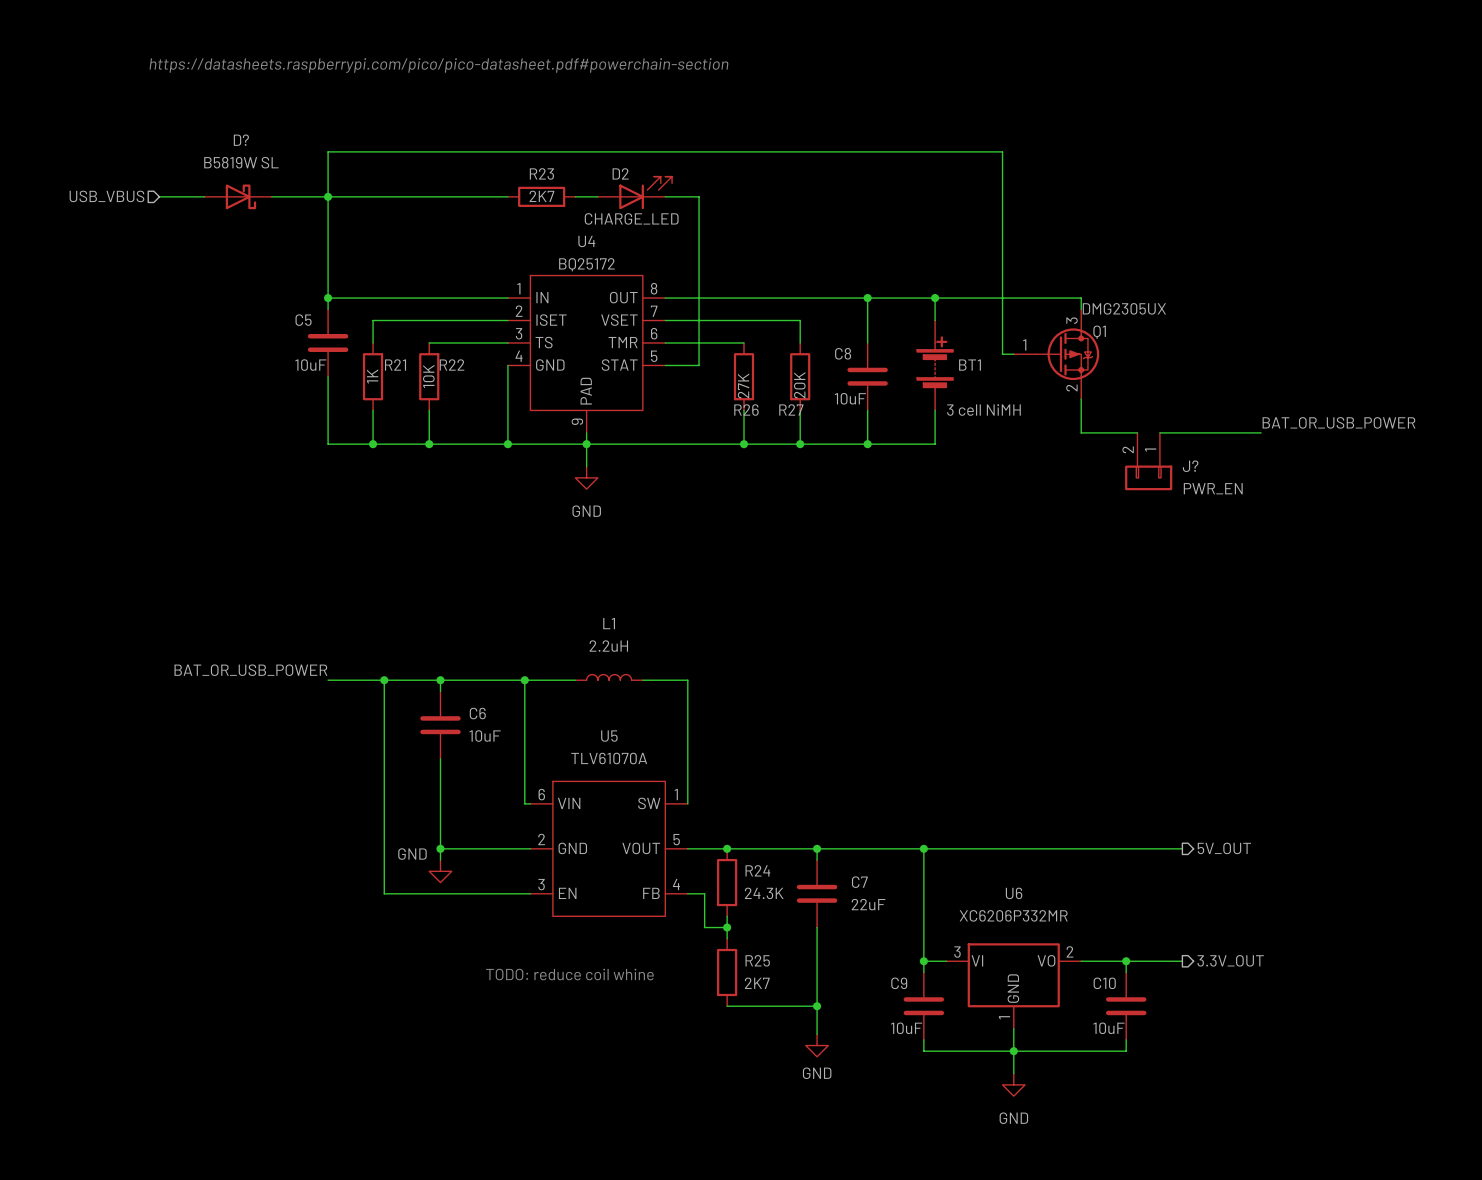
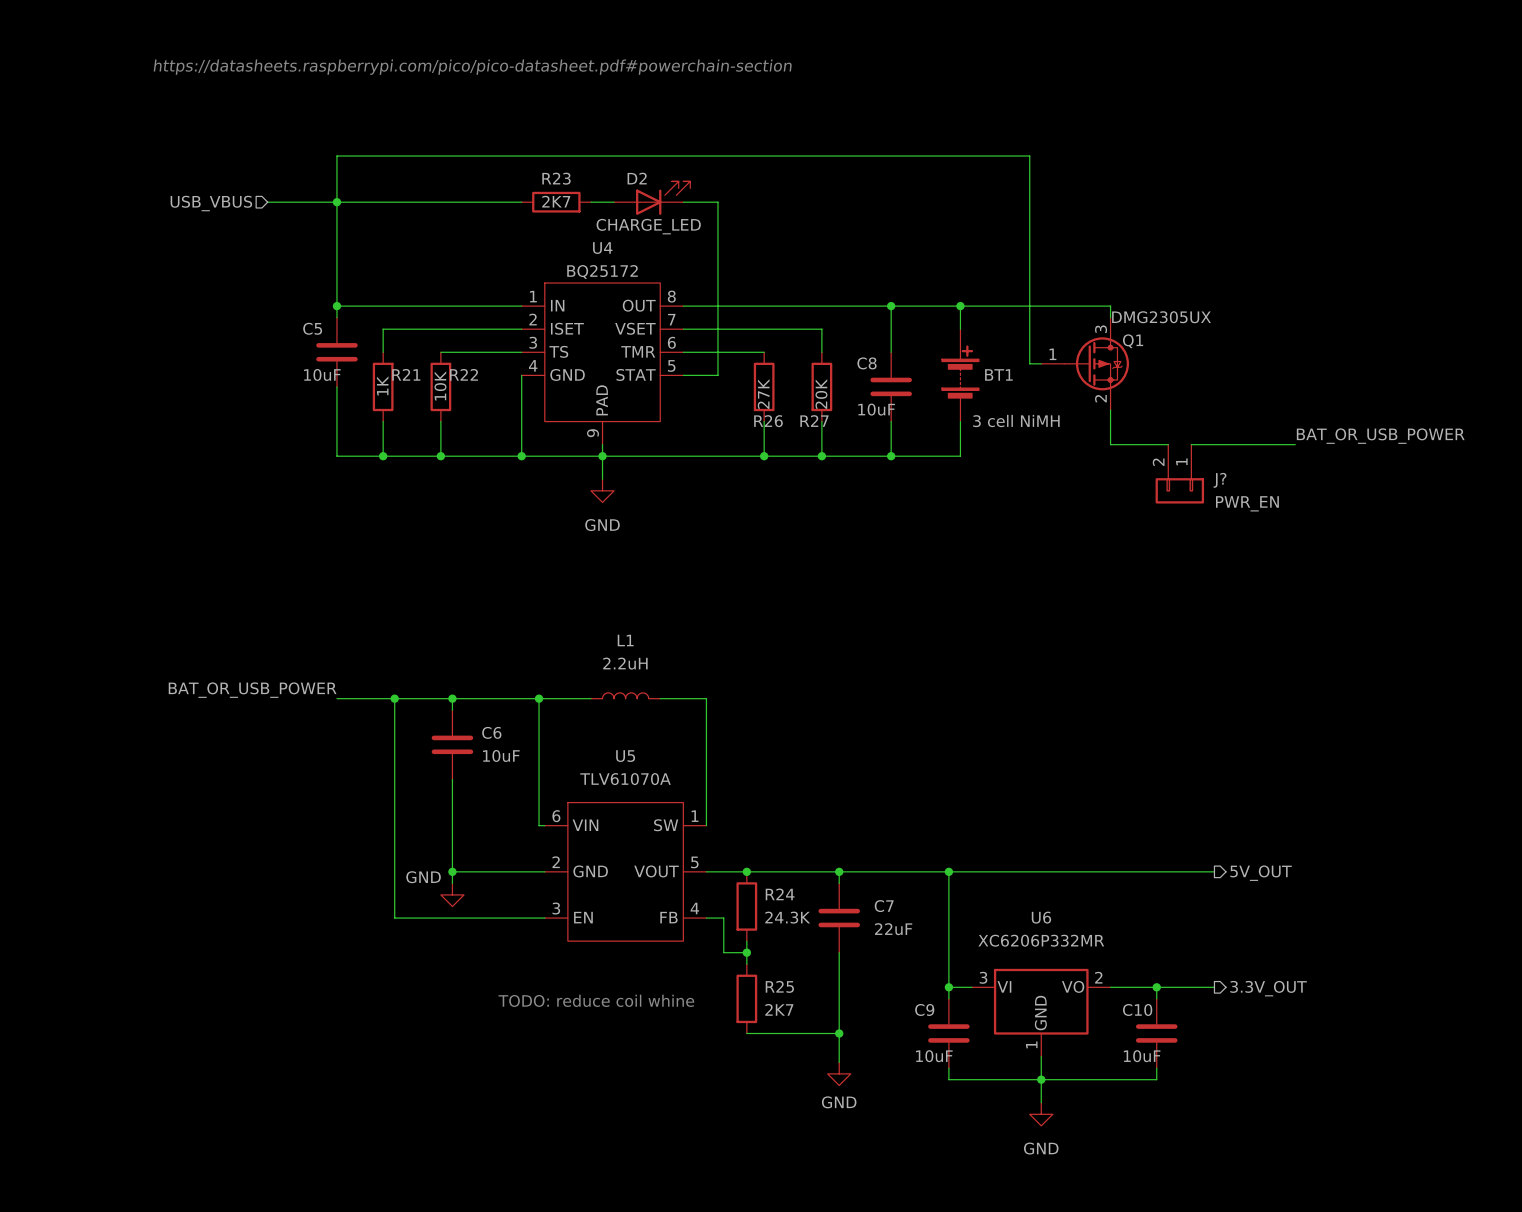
hierarchical label position: USB_VBUS (106, 196) -> USB_VBUS (211, 203)
wire: (159, 196) (204, 196) -> none
D?: B5819W SL (238, 196) -> none

